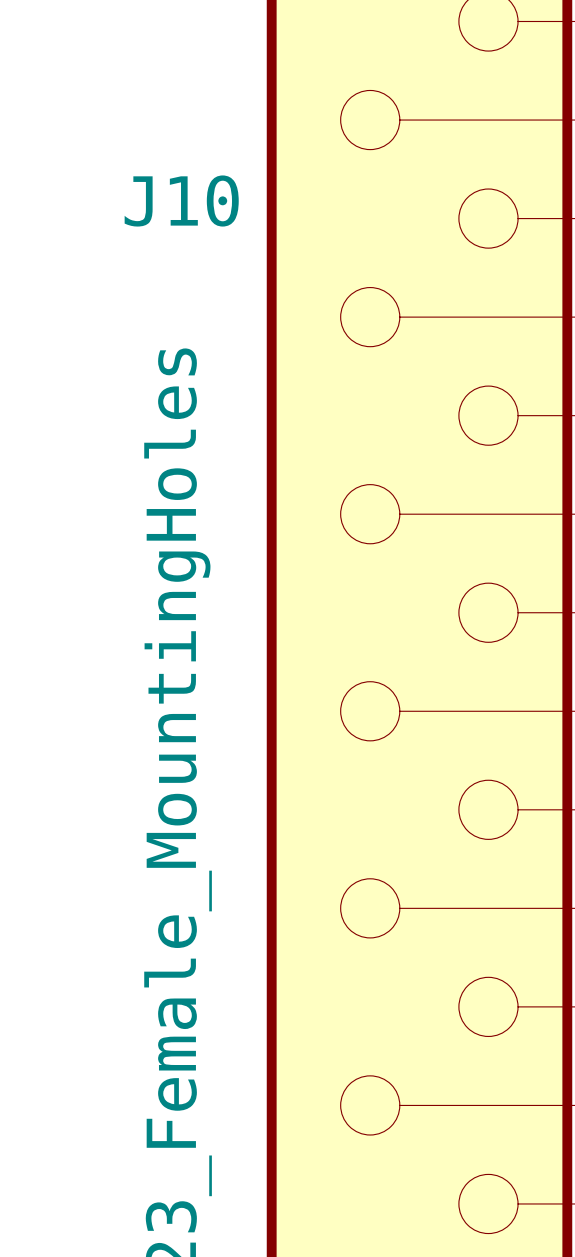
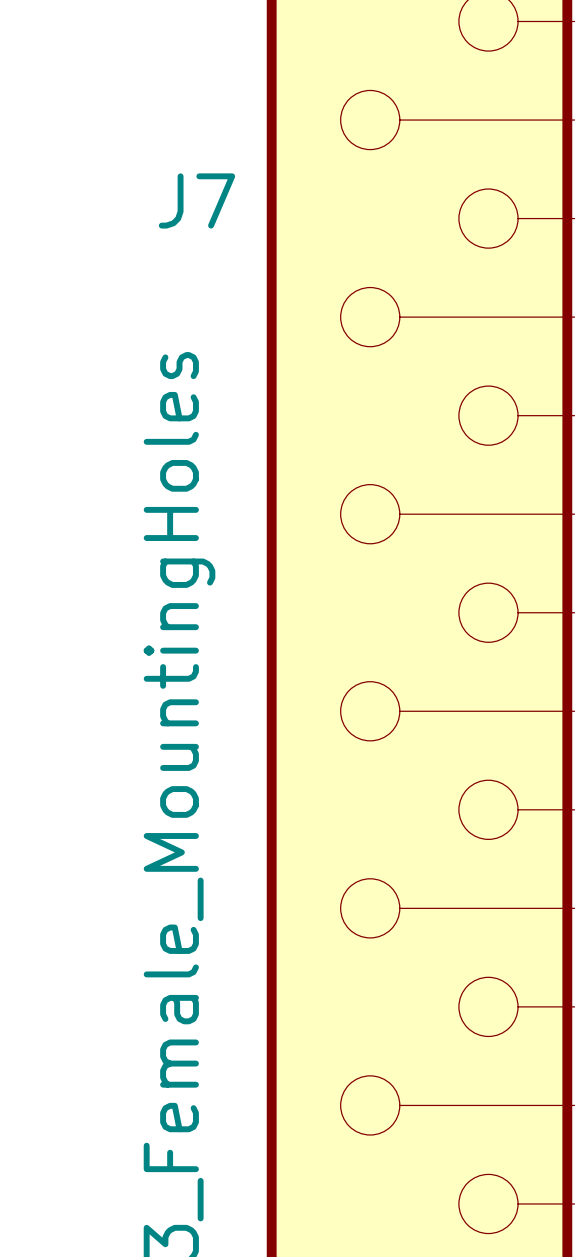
J10 name: J10 (181, 201) -> J7 (196, 200)

